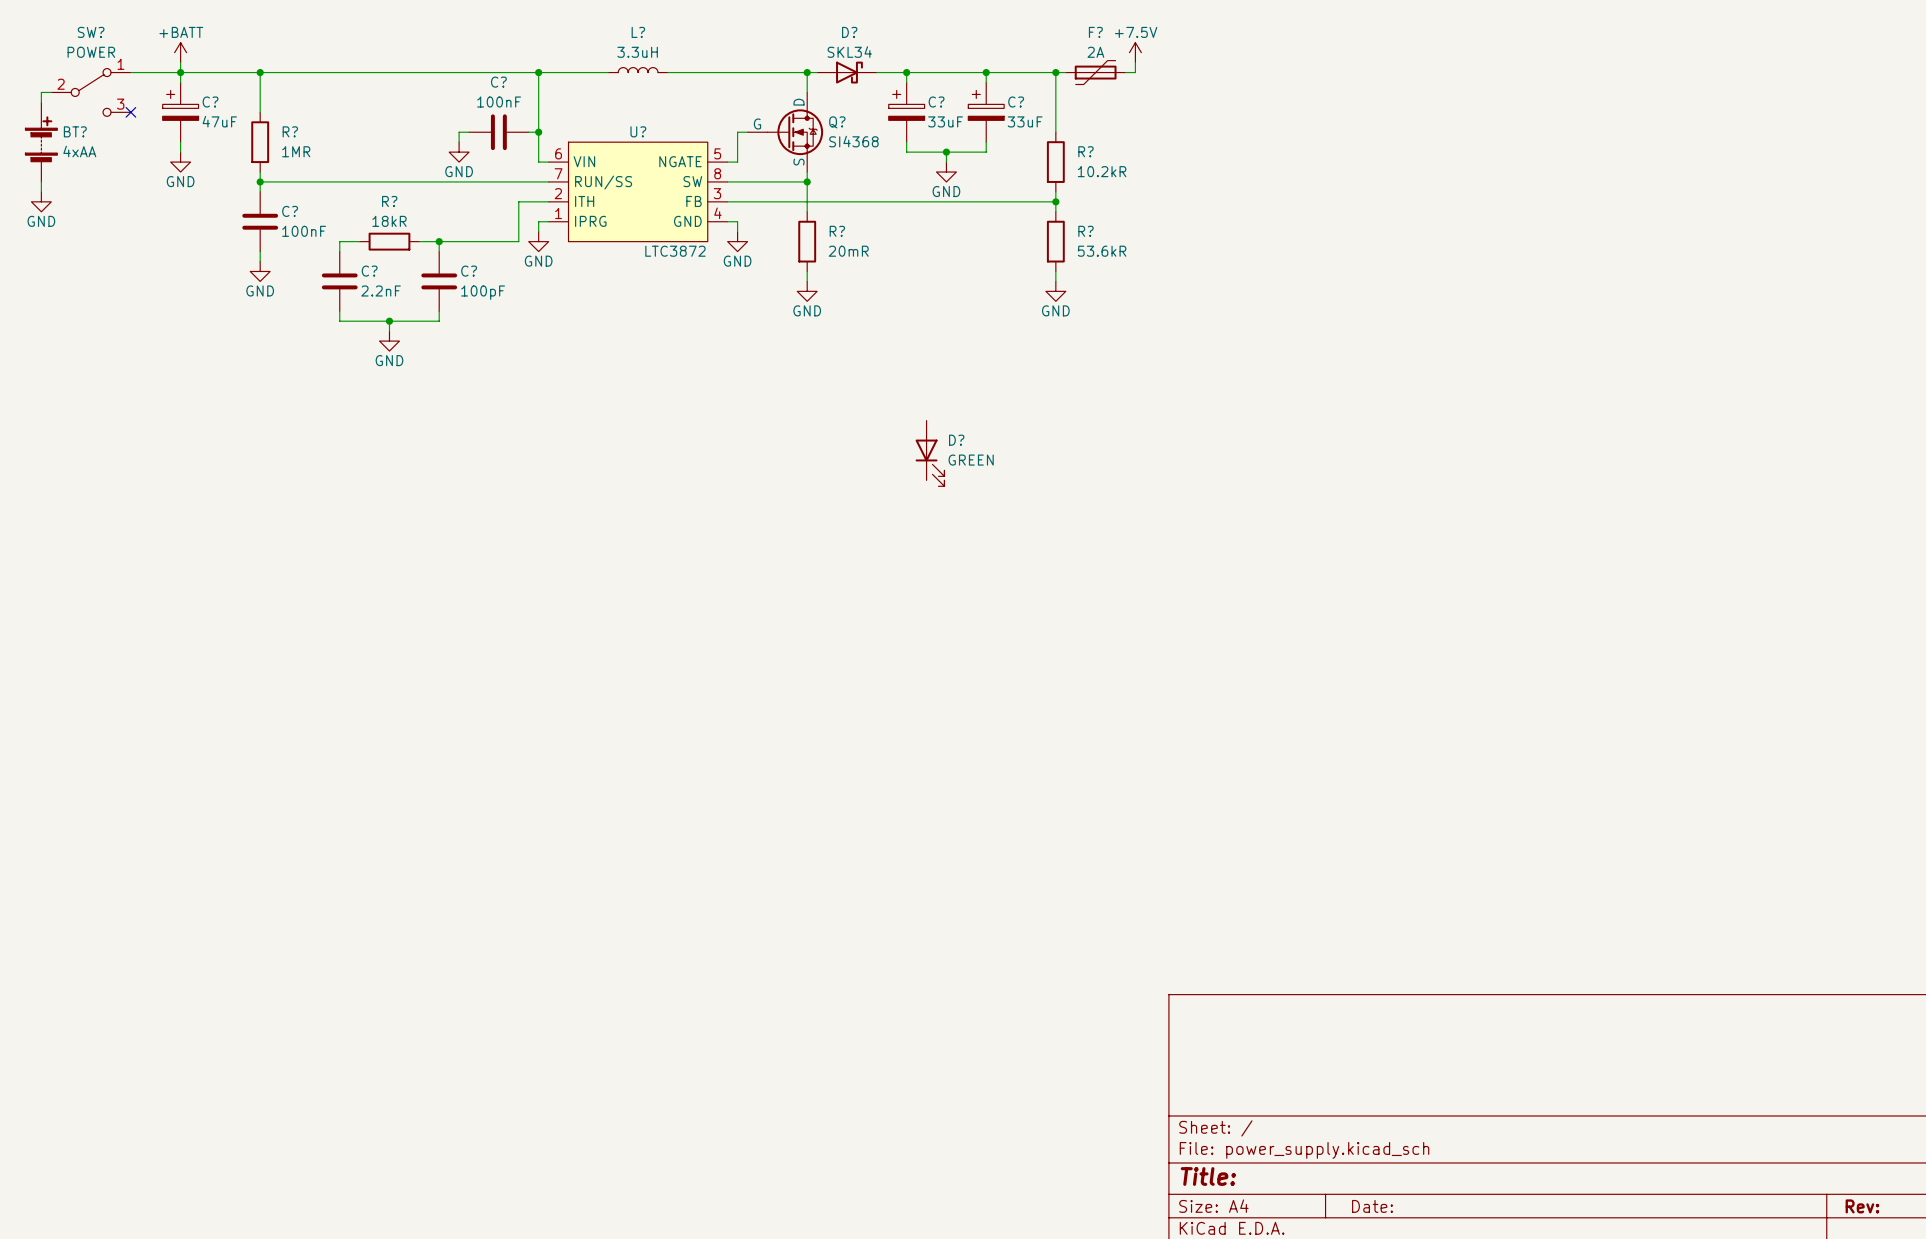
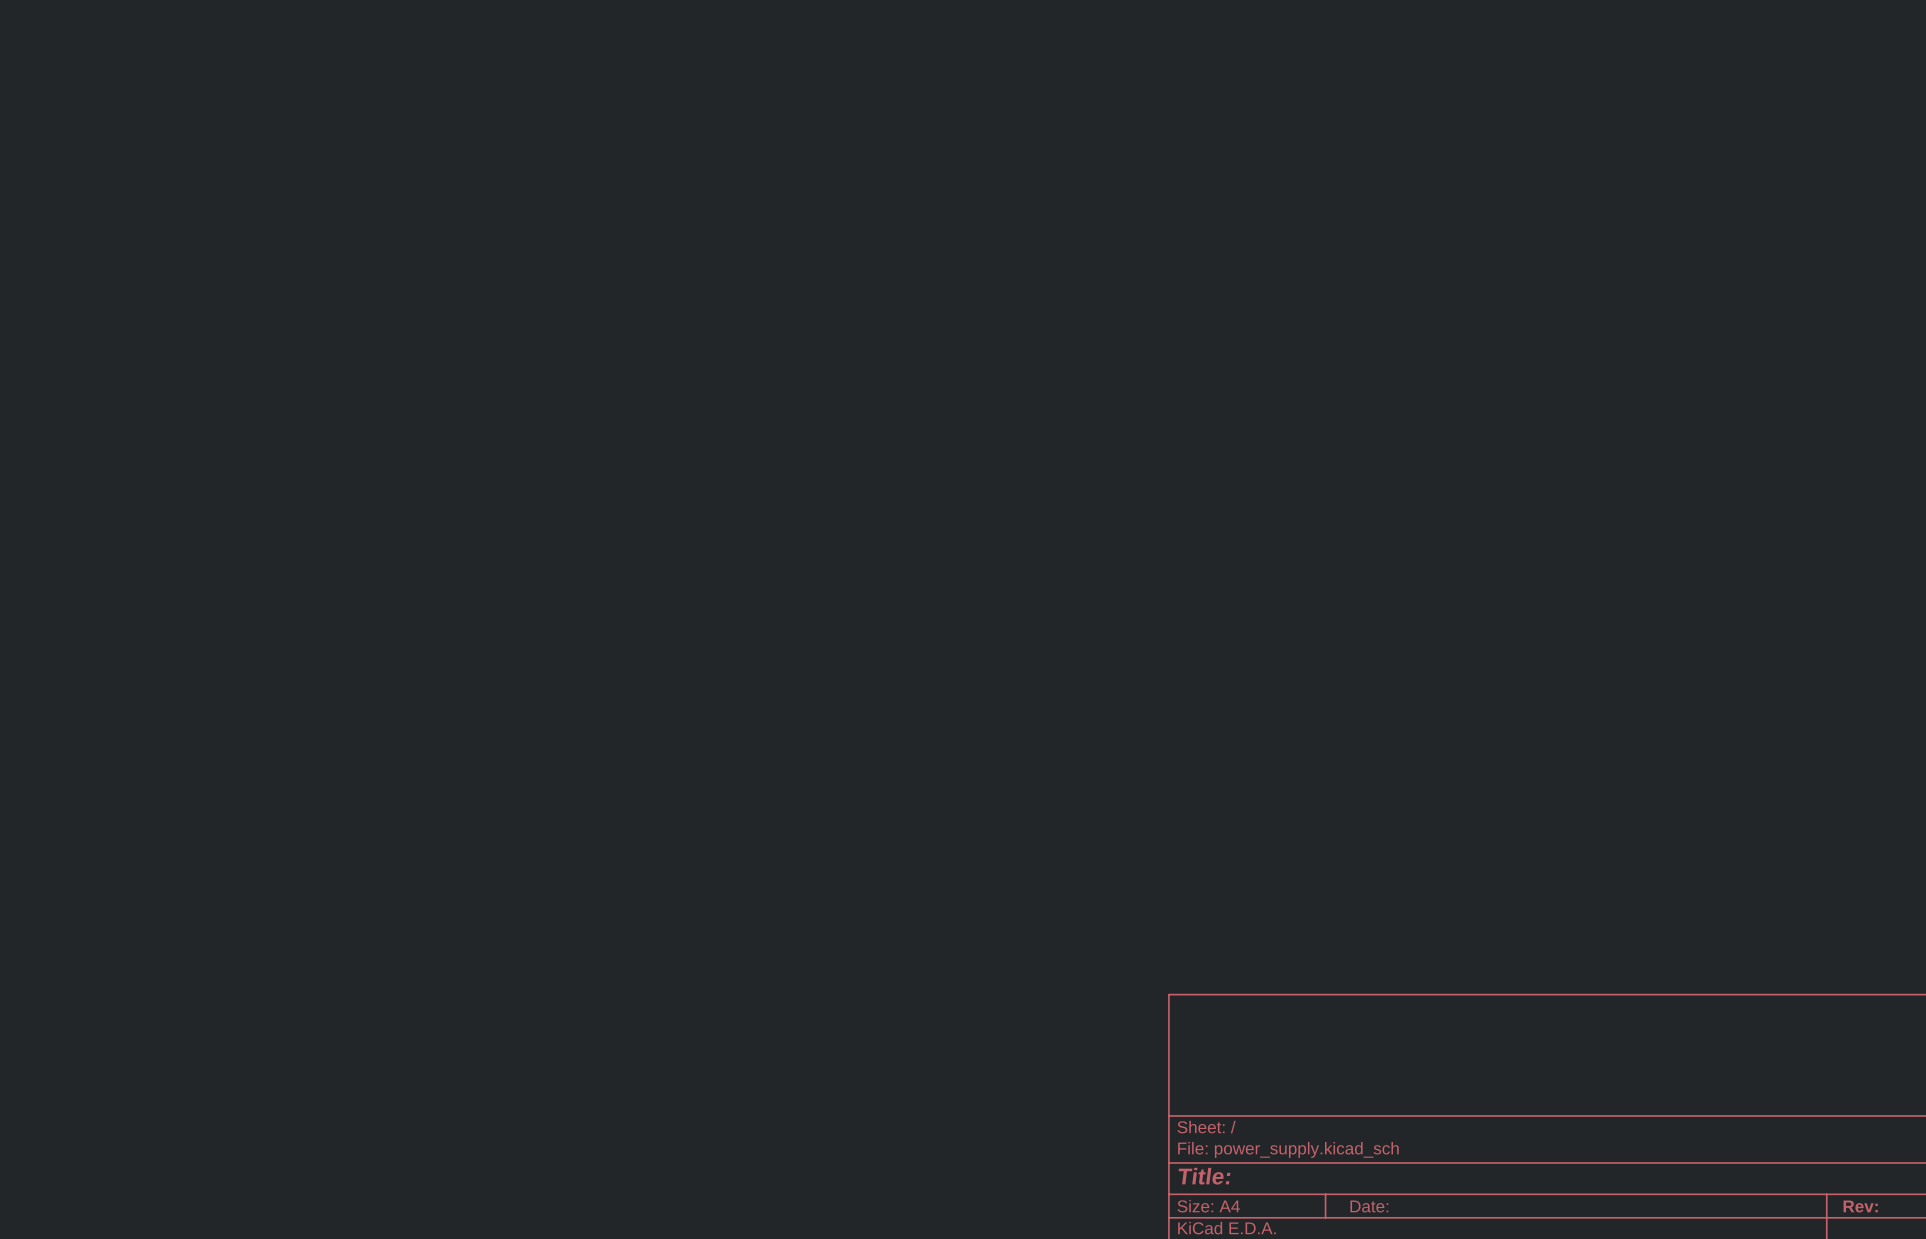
power symbol: +BATT (180, 52) -> none
power symbol: +7.5V (1135, 52) -> none
wire: (180, 62) (180, 82) -> none
wire: (1135, 62) (1135, 72) (1125, 72) -> none
L?: 3.3uH (638, 70) -> none
wire: (130, 72) (608, 72) -> none
junction: (180, 72) -> none
wire: (260, 72) (260, 112) -> none
junction: (260, 72) -> none
wire: (538, 72) (538, 162) (548, 162) -> none
junction: (538, 72) -> none
wire: (667, 72) (817, 72) -> none
wire: (807, 72) (807, 92) -> none
junction: (807, 72) -> none
D?: SKL34 (846, 72) -> none
wire: (876, 72) (1065, 72) -> none
wire: (906, 72) (906, 82) -> none
junction: (906, 72) -> none
wire: (986, 72) (986, 82) -> none
junction: (986, 72) -> none
wire: (1055, 72) (1055, 132) -> none
junction: (1055, 72) -> none
F?: 2A (1095, 72) -> none
wire: (51, 92) (41, 92) (41, 102) -> none
SW?: POWER (91, 92) -> none
no-connect mark: (130, 112) -> none
C?: 47uF (180, 112) -> none
C?: 33uF (906, 112) -> none
C?: 33uF (986, 112) -> none
wire: (469, 132) (459, 132) (459, 142) -> none
C?: 100nF (498, 132) -> none
wire: (528, 132) (538, 132) -> none
junction: (538, 132) -> none
wire: (747, 132) (737, 132) (737, 162) (727, 162) -> none
Q?: SI4368 (785, 132) -> none
BT?: 4xAA (41, 142) -> none
wire: (180, 142) (180, 152) -> none
R?: 1MR (260, 142) -> none
wire: (906, 142) (906, 152) (986, 152) (986, 142) -> none
power symbol: GND (459, 152) -> none
wire: (946, 152) (946, 162) -> none
junction: (946, 152) -> none
power symbol: GND (180, 162) -> none
R?: 10.2kR (1055, 162) -> none
wire: (260, 172) (260, 191) -> none
wire: (807, 172) (807, 211) -> none
power symbol: GND (946, 172) -> none
wire: (41, 181) (41, 191) -> none
wire: (260, 181) (548, 181) -> none
junction: (260, 181) -> none
wire: (727, 181) (807, 181) -> none
junction: (807, 181) -> none
U?: LTC3872 (638, 191) -> none
wire: (1055, 191) (1055, 211) -> none
power symbol: GND (41, 201) -> none
wire: (548, 201) (518, 201) (518, 241) (419, 241) -> none
wire: (727, 201) (1055, 201) -> none
junction: (1055, 201) -> none
C?: 100nF (260, 221) -> none
wire: (548, 221) (538, 221) (538, 231) -> none
wire: (727, 221) (737, 221) (737, 231) -> none
wire: (359, 241) (339, 241) (339, 251) -> none
R?: 18kR (389, 241) -> none
wire: (439, 241) (439, 251) -> none
junction: (439, 241) -> none
power symbol: GND (538, 241) -> none
power symbol: GND (737, 241) -> none
R?: 20mR (807, 241) -> none
R?: 53.6kR (1055, 241) -> none
wire: (260, 251) (260, 261) -> none
power symbol: GND (260, 271) -> none
wire: (807, 271) (807, 281) -> none
wire: (1055, 271) (1055, 281) -> none
C?: 2.2nF (339, 281) -> none
C?: 100pF (439, 281) -> none
power symbol: GND (807, 291) -> none
power symbol: GND (1055, 291) -> none
wire: (339, 311) (339, 321) (439, 321) (439, 311) -> none
wire: (389, 321) (389, 331) -> none
junction: (389, 321) -> none
power symbol: GND (389, 341) -> none
D?: GREEN (930, 453) -> none

